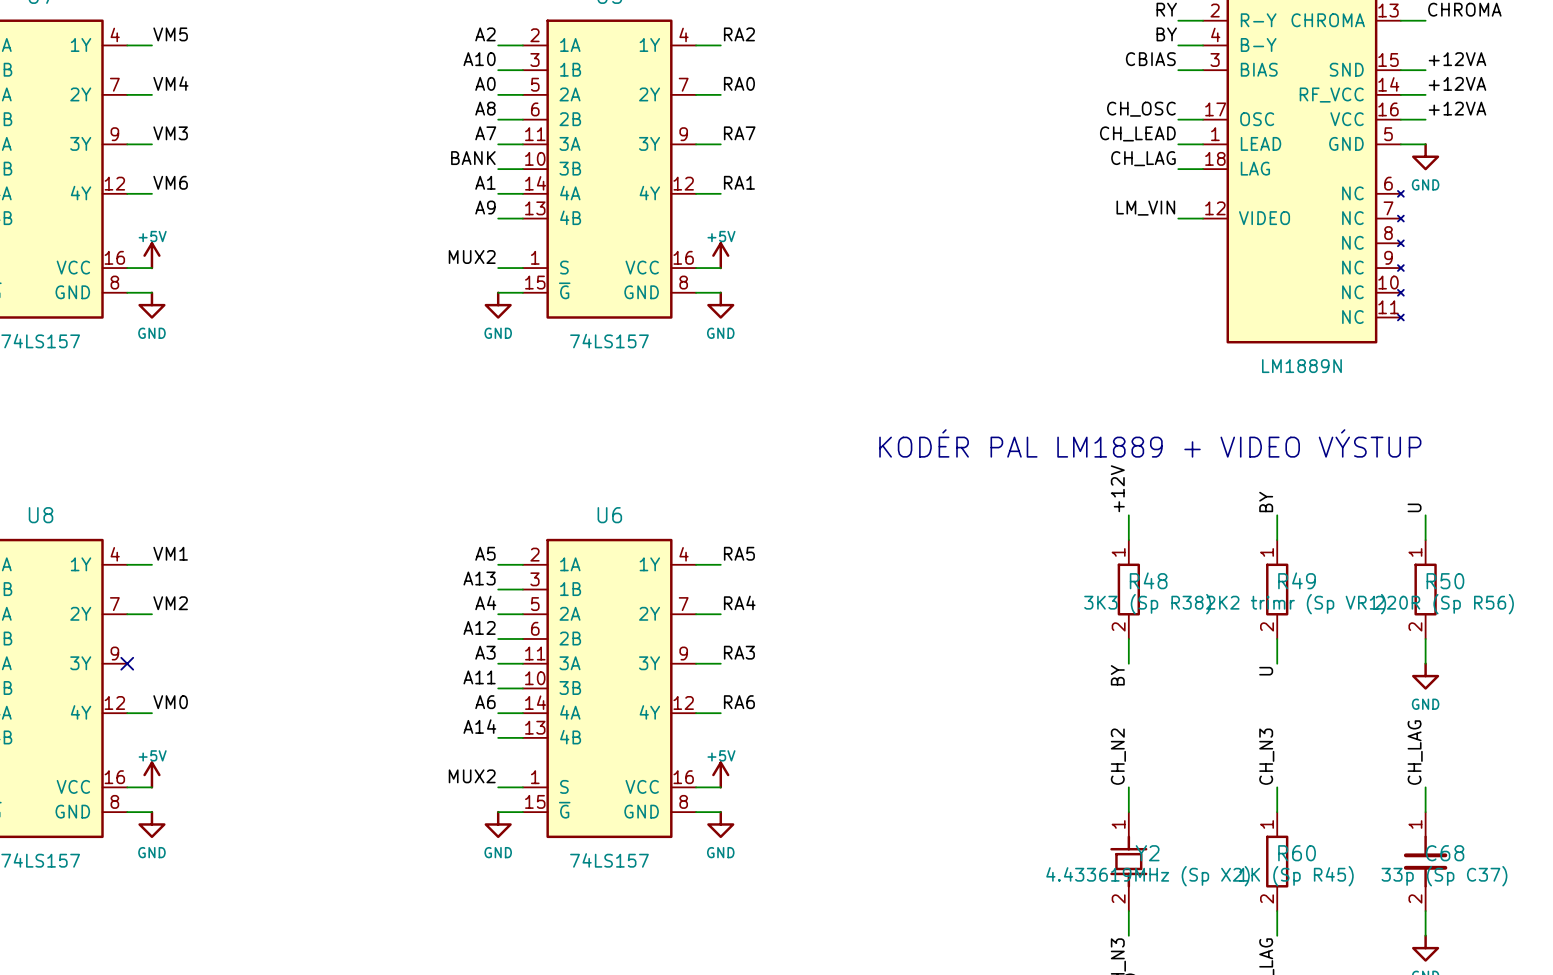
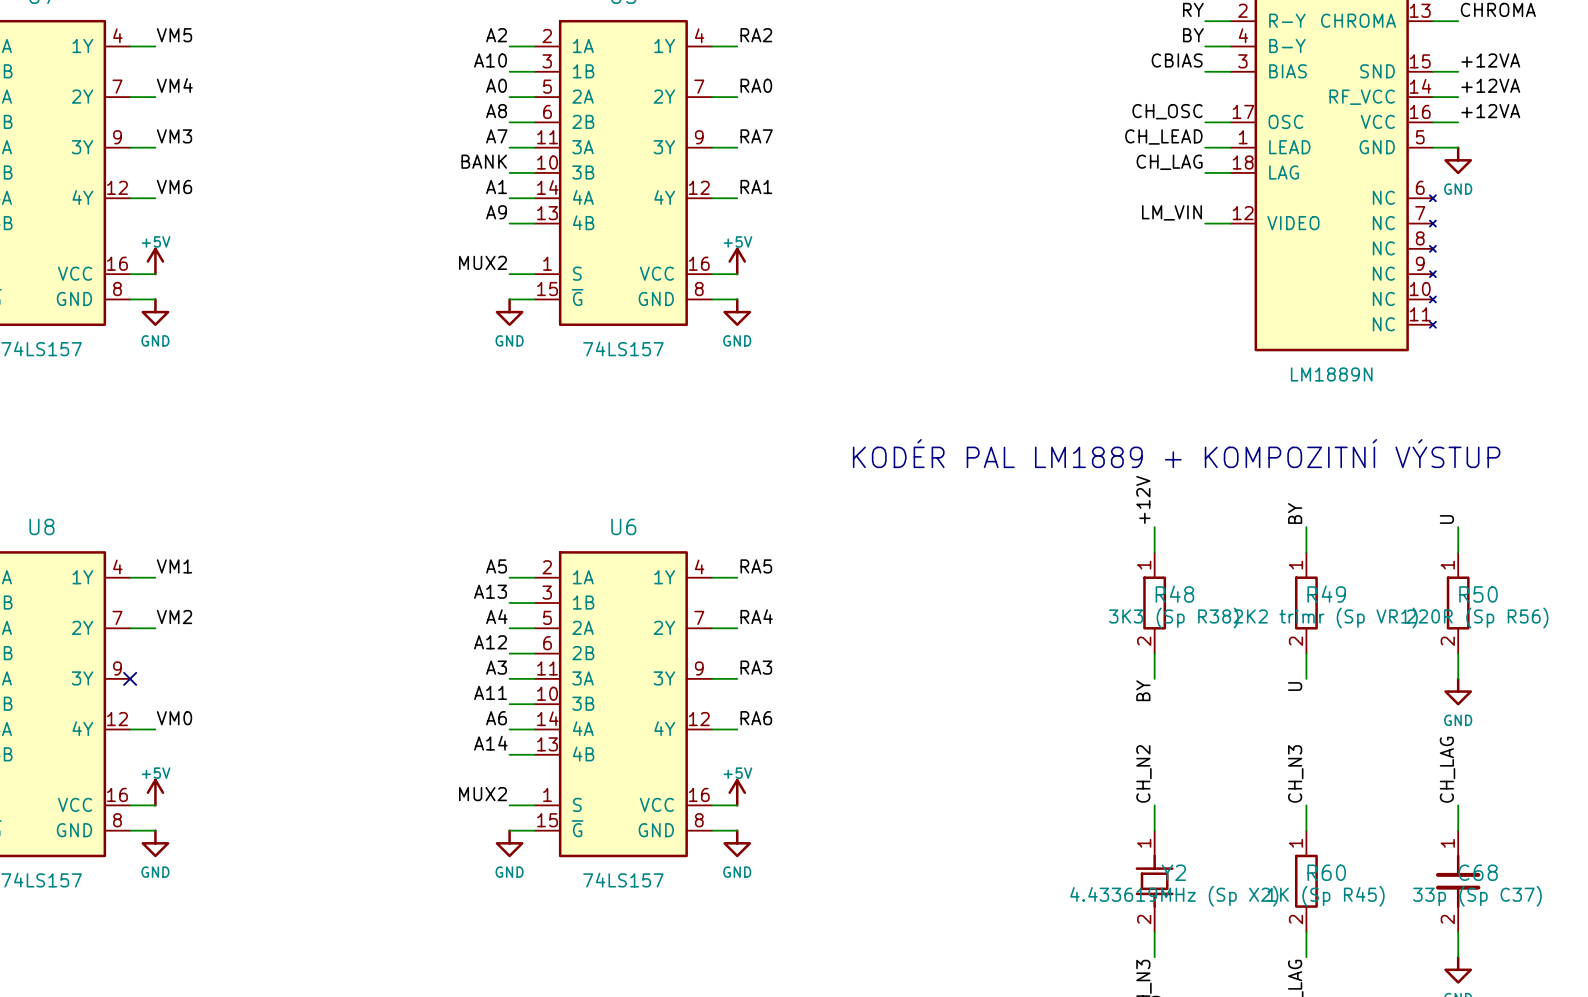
text: KODÉR PAL LM1889 + VIDEO VÝSTUP (1150, 443) -> KODÉR PAL LM1889 + KOMPOZITNÍ VÝSTUP (1176, 453)

